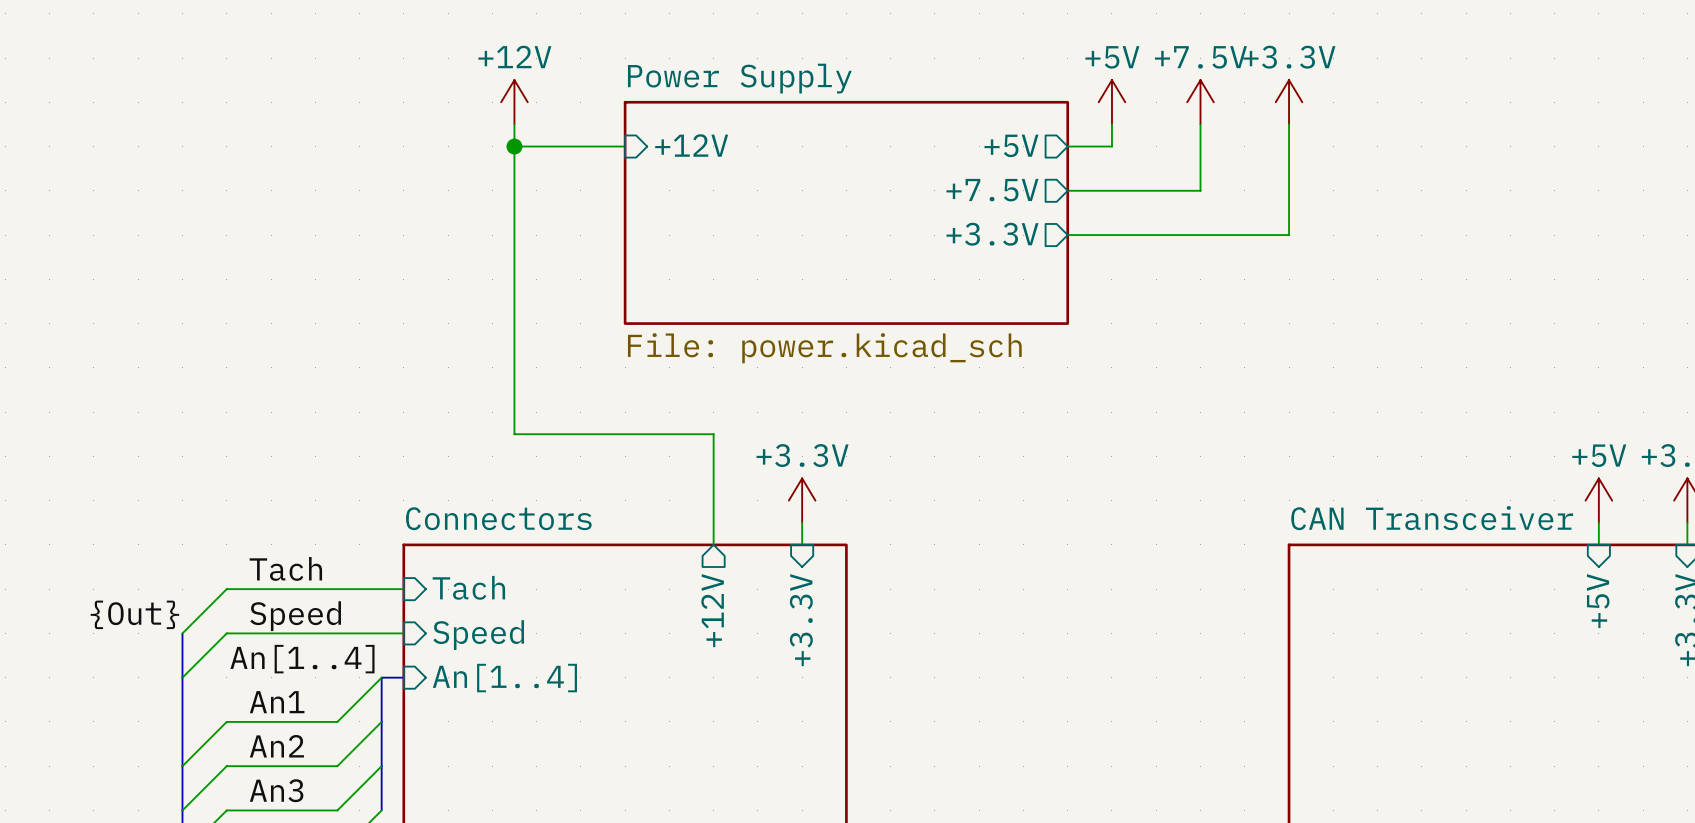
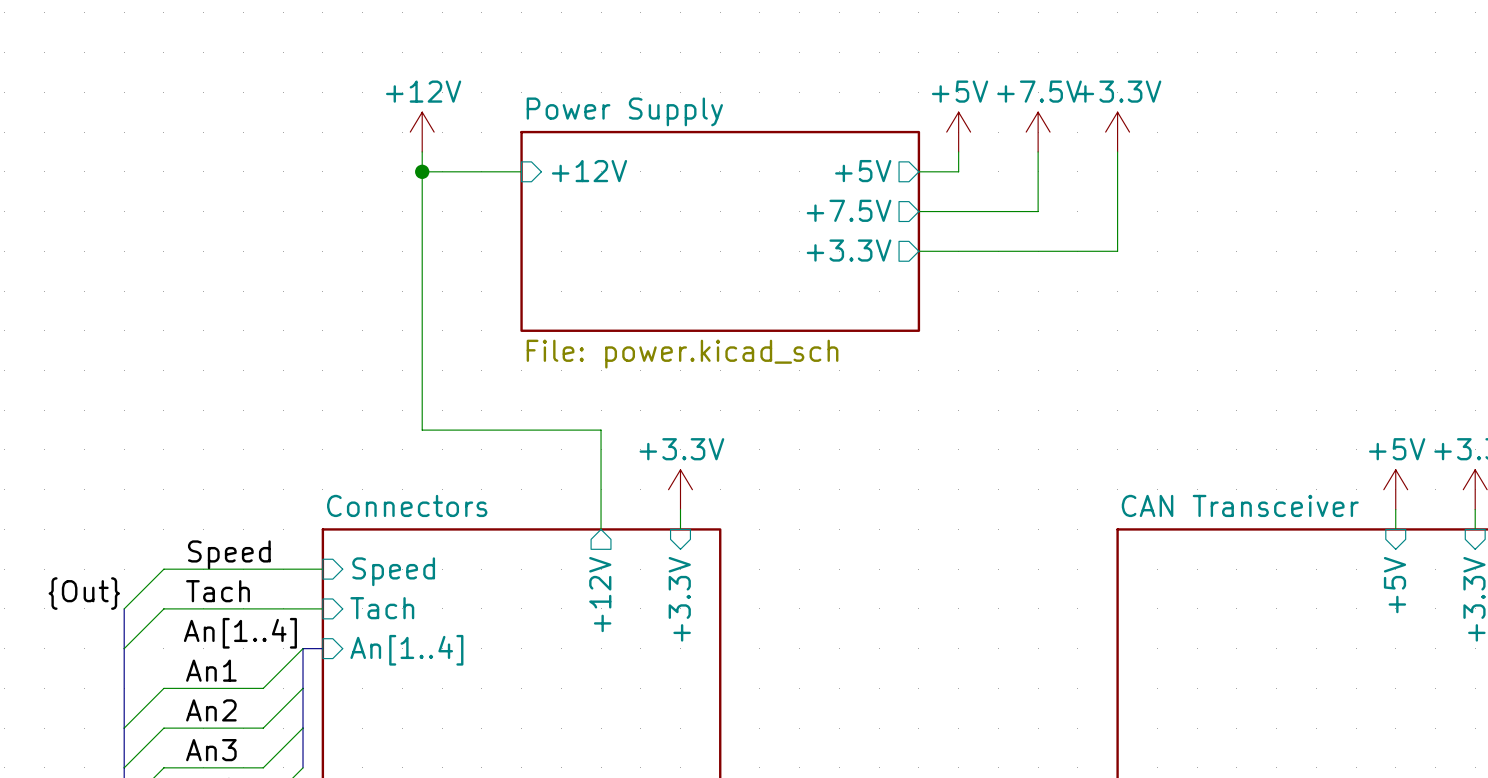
label: Tach (285, 568) -> Speed (229, 554)
sheet pin: Tach (468, 587) -> Speed (393, 571)
label: Speed (295, 616) -> Tach (218, 591)
sheet pin: Speed (478, 635) -> Tach (382, 608)

